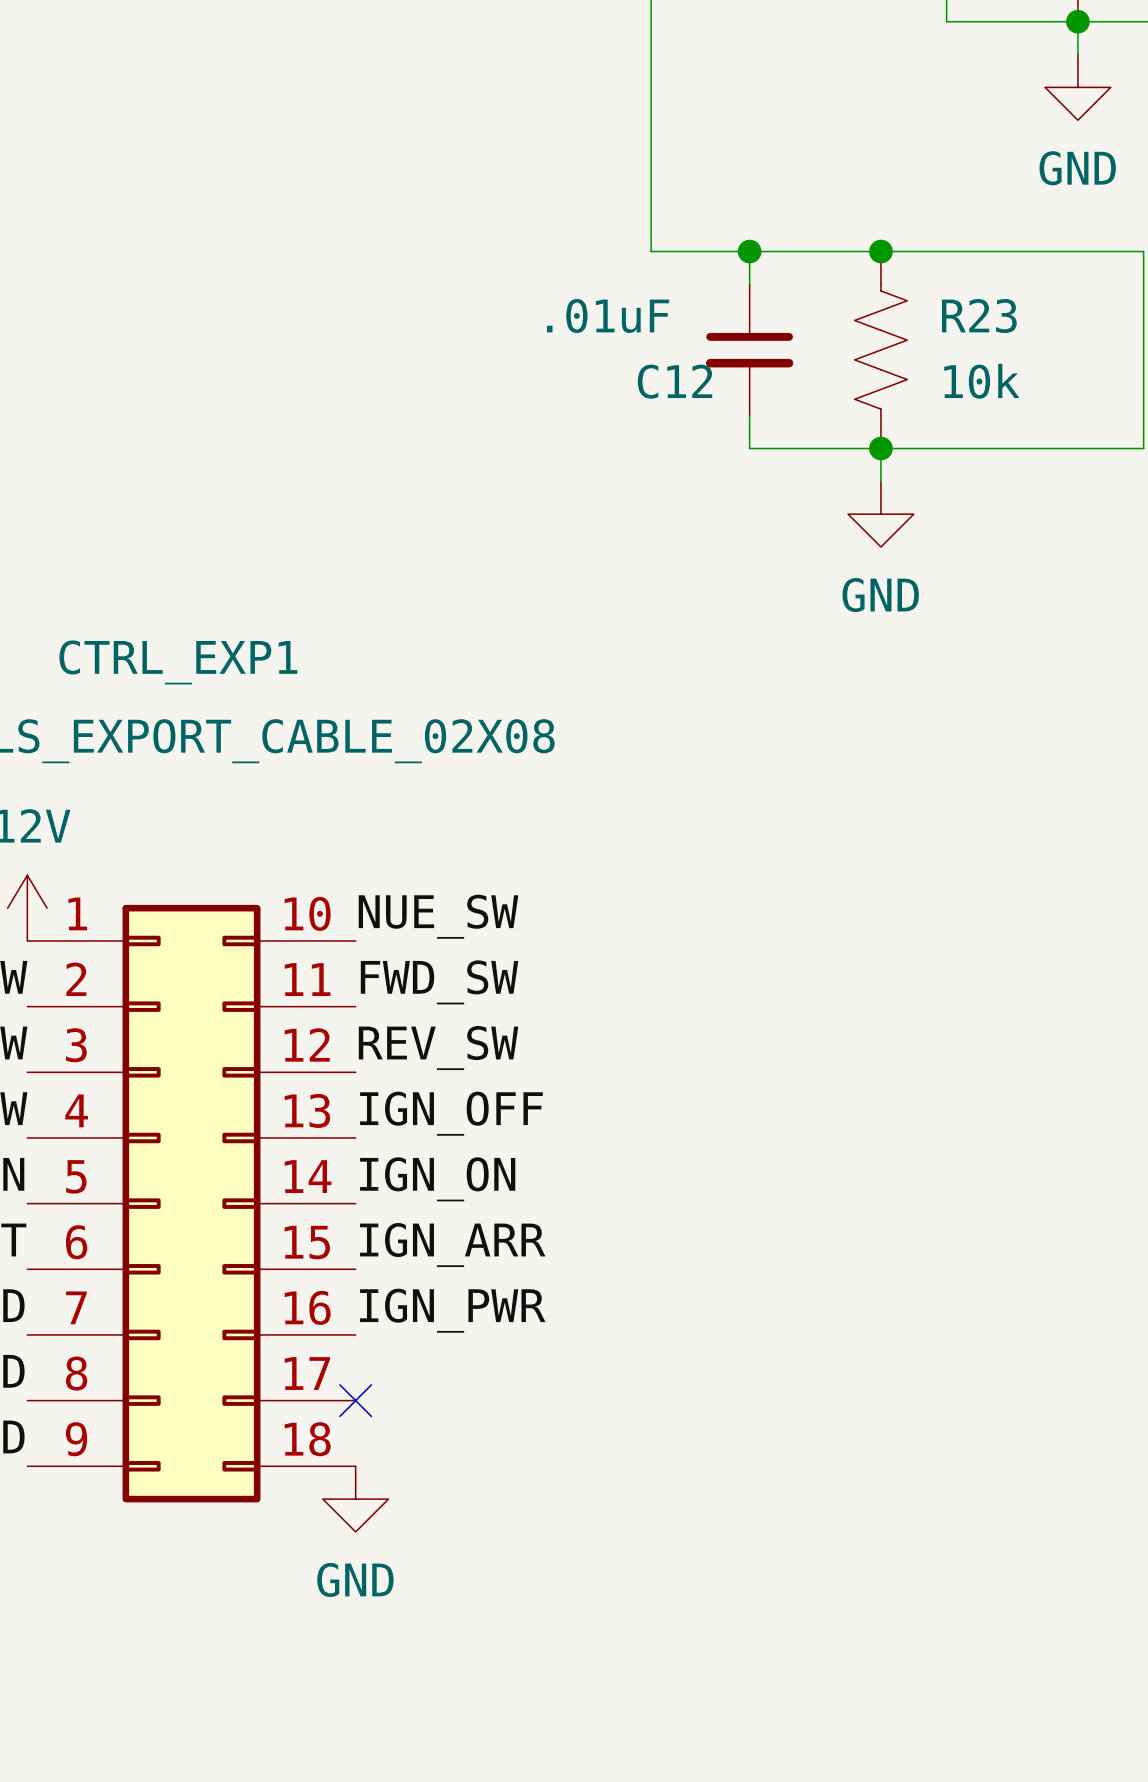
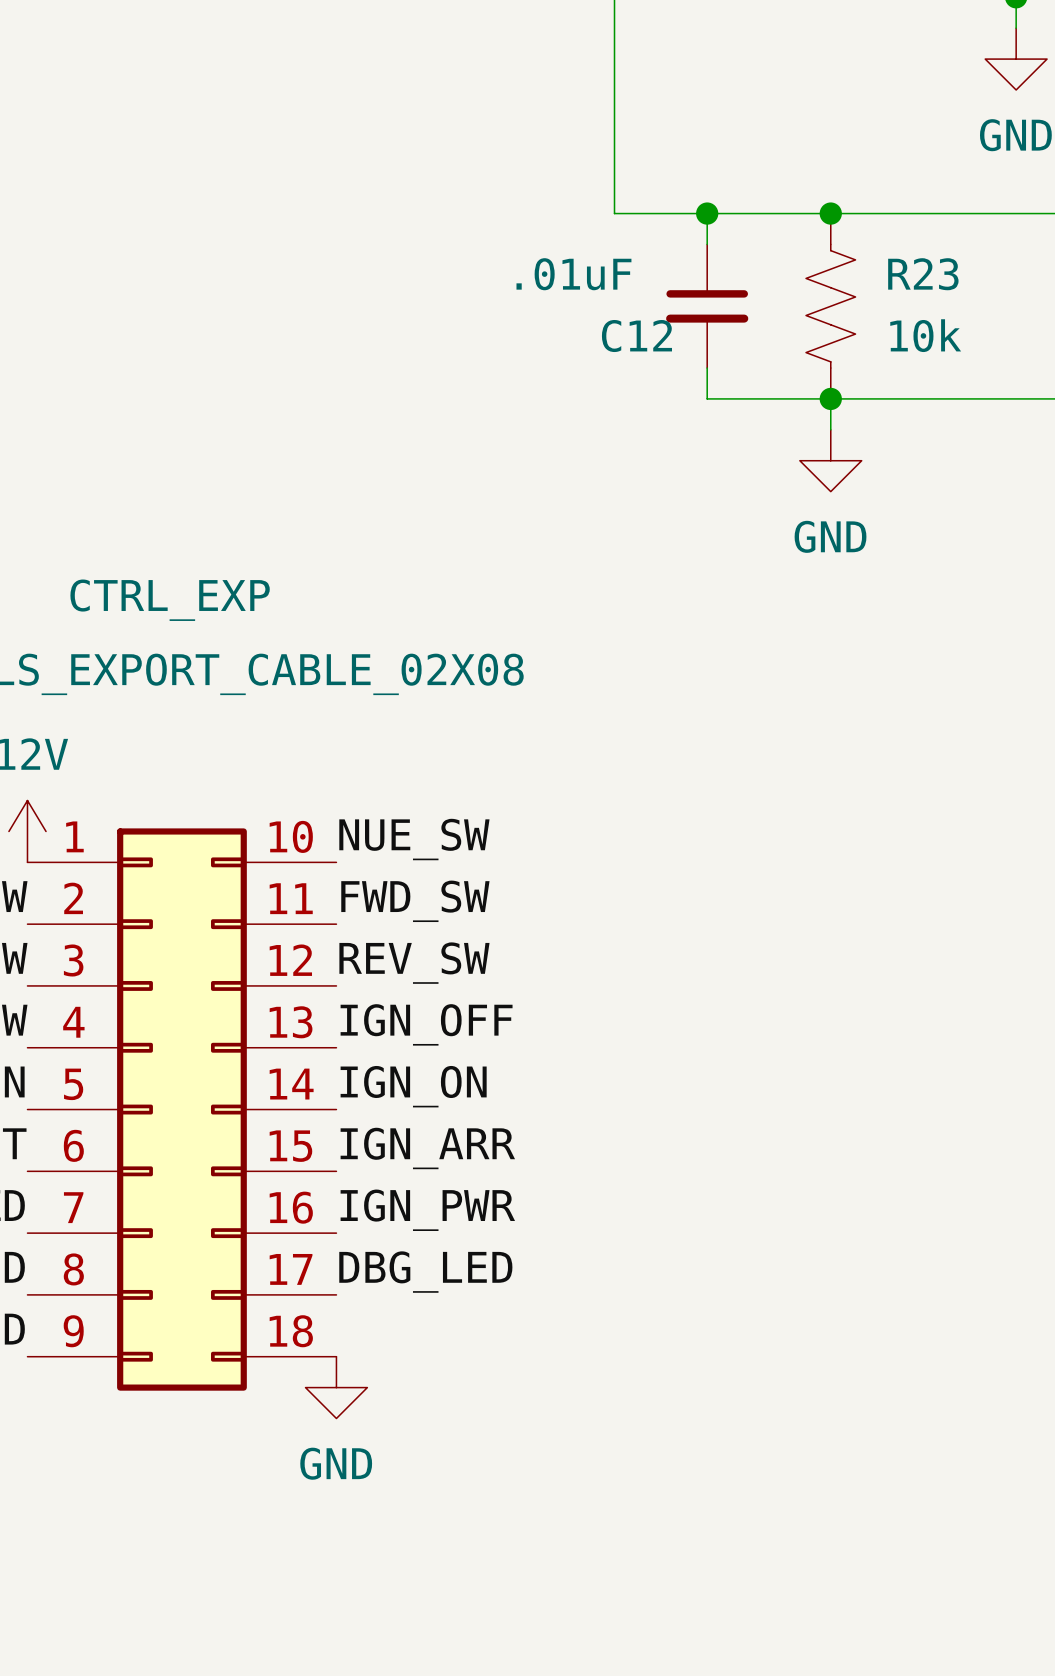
CTRL_EXP1 name: CTRL_EXP1 (178, 662) -> CTRL_EXP (170, 600)
label: none -> DBG_LED (425, 1272)
no-connect mark: (355, 1400) -> none

